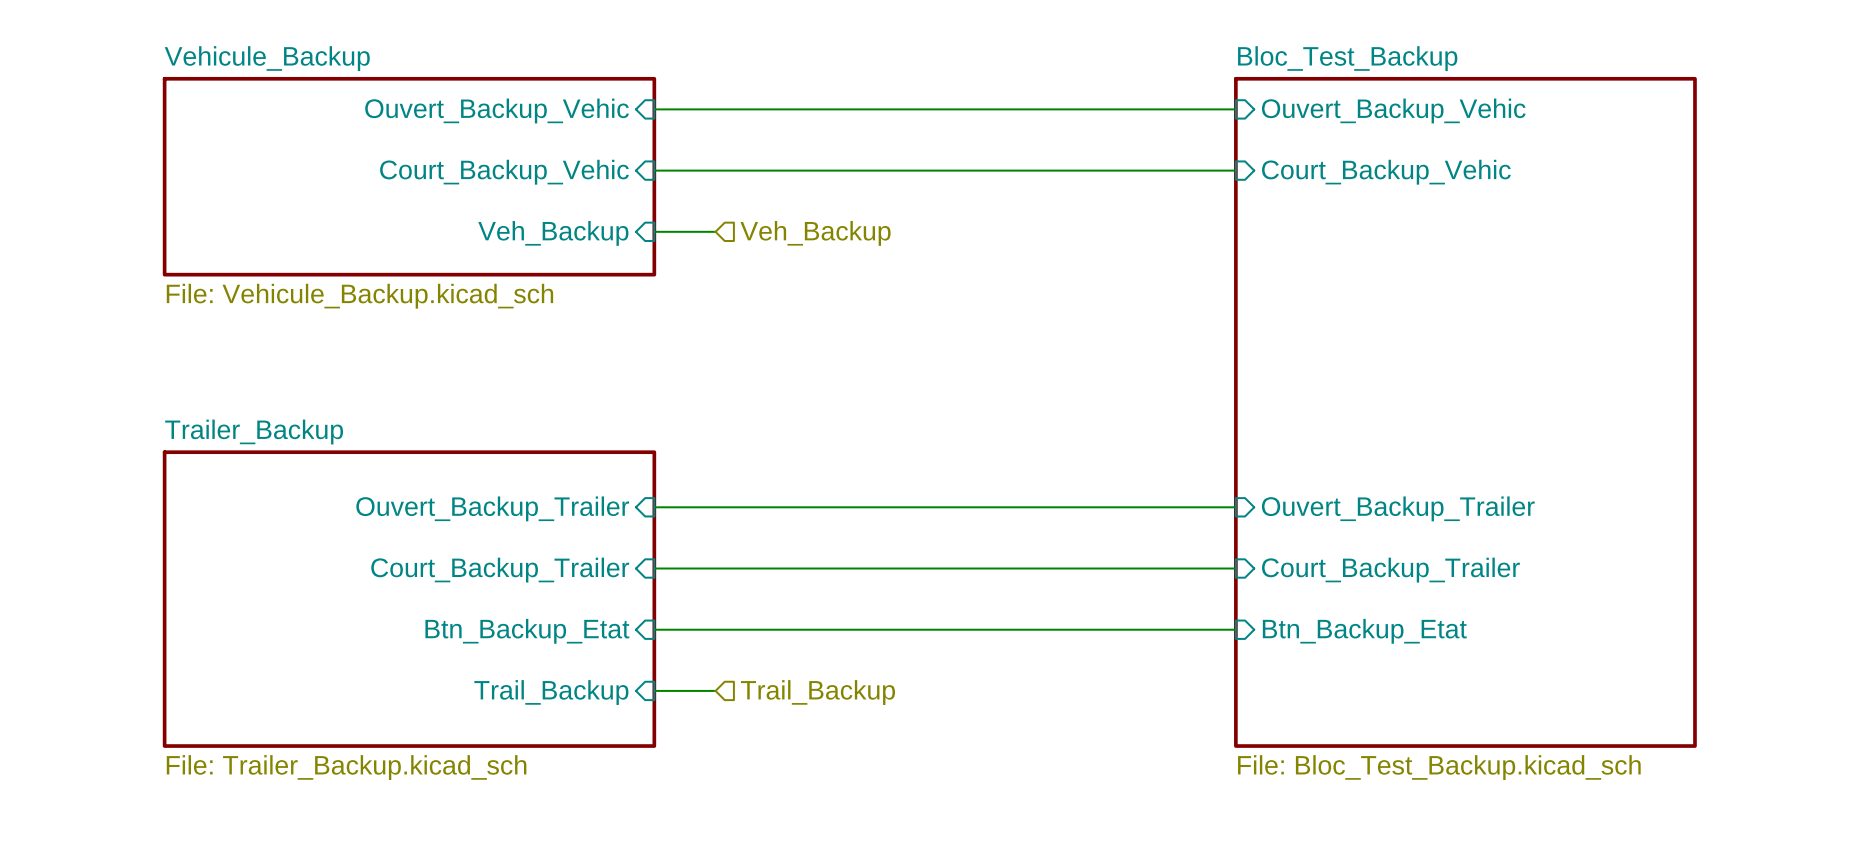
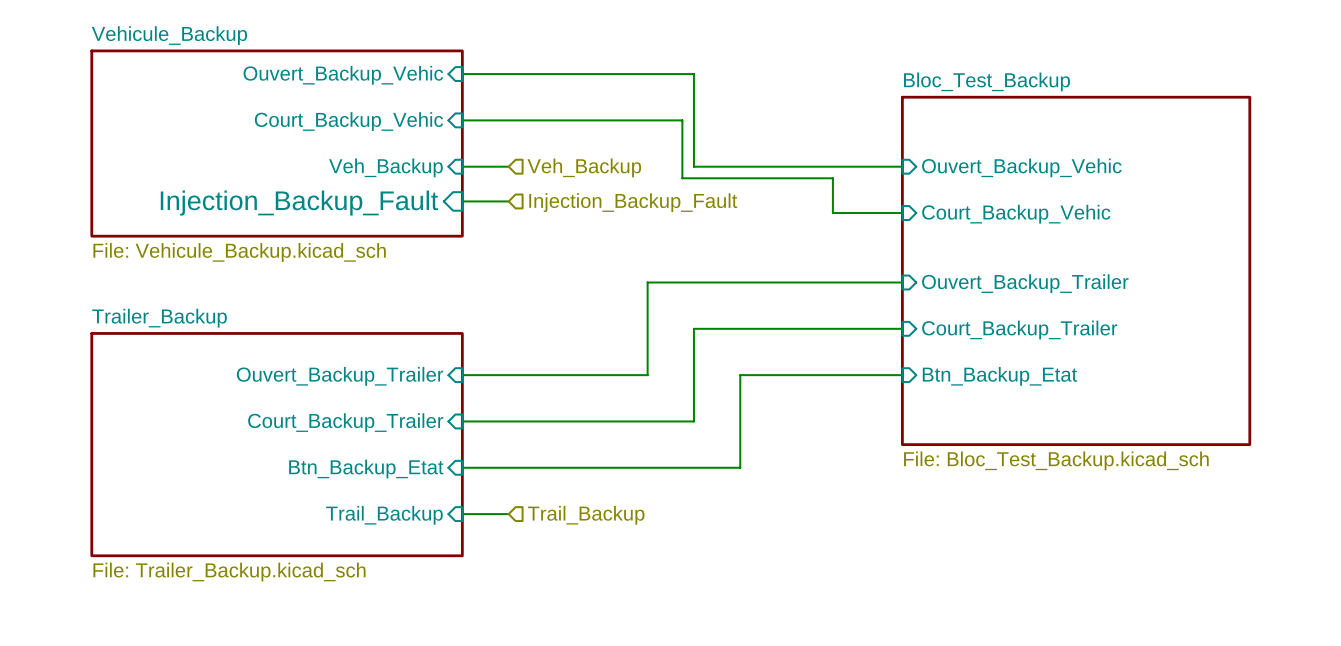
wire: (960, 109) (1235, 109) -> (693, 74) (693, 166) (902, 166)
sheet pin position: Ouvert_Backup_Vehic (1393, 110) -> Ouvert_Backup_Vehic (1021, 167)
wire: (945, 170) (1235, 170) -> (682, 120) (682, 178) (832, 178) (832, 213) (902, 213)
sheet pin position: Court_Backup_Vehic (1386, 172) -> Court_Backup_Vehic (1016, 214)
sheet Vehicule_Backup: File: Vehicule_Backup.kicad_sch (409, 176) -> none
sheet Vehicule_Backup: none -> File: Vehicule_Backup.kicad_sch (277, 143)
wire: none -> (462, 201) (508, 201)
sheet pin: none -> Injection_Backup_Fault (299, 203)
hierarchical label: none -> Injection_Backup_Fault (633, 202)
sheet Bloc_Test_Backup: none -> File: Bloc_Test_Backup.kicad_sch (1076, 270)
wire: none -> (902, 282) (647, 282) (647, 375)
sheet pin: none -> Ouvert_Backup_Trailer (1025, 283)
sheet Bloc_Test_Backup: File: Bloc_Test_Backup.kicad_sch (1465, 412) -> none
wire: (899, 507) (1021, 507) -> (740, 467) (740, 375)
sheet pin: Ouvert_Backup_Trailer (1398, 508) -> Btn_Backup_Etat (999, 376)
wire: (960, 568) (1235, 568) -> (693, 421) (693, 328) (902, 328)
sheet pin position: Court_Backup_Trailer (1390, 570) -> Court_Backup_Trailer (1019, 330)
wire: (1021, 629) (1235, 629) -> none
sheet pin: Btn_Backup_Etat (1364, 631) -> none

